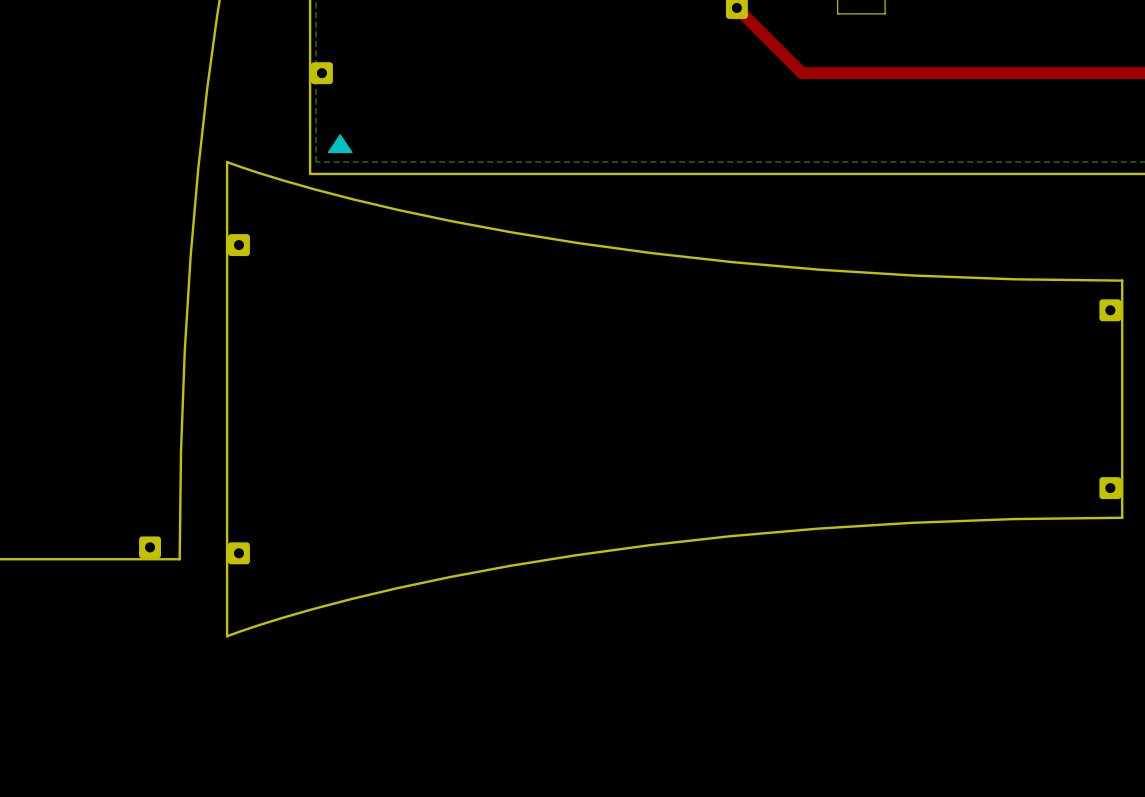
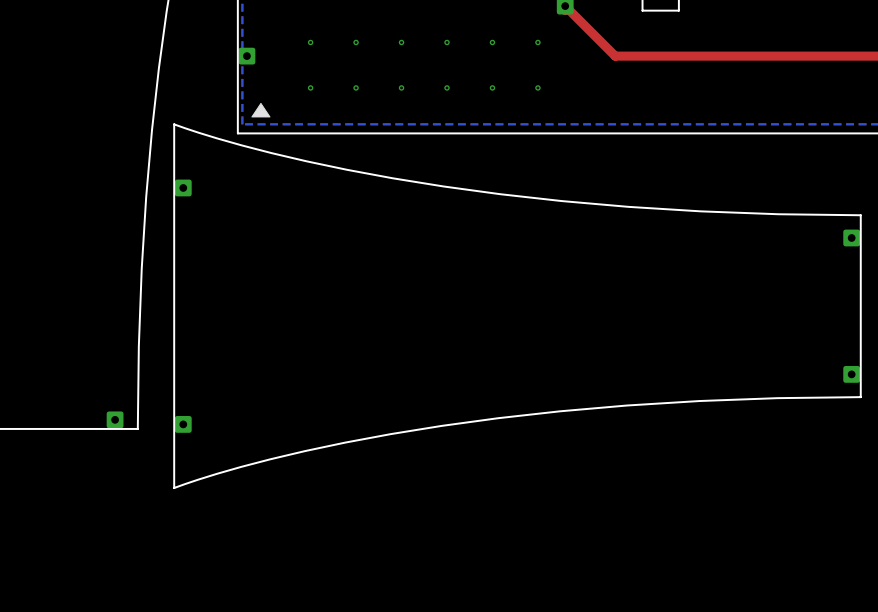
via: none -> (310, 42)
via: none -> (356, 42)
via: none -> (401, 42)
via: none -> (447, 42)
via: none -> (492, 42)
via: none -> (537, 42)
via: none -> (310, 87)
via: none -> (356, 87)
via: none -> (401, 87)
via: none -> (447, 87)
via: none -> (492, 87)
via: none -> (537, 87)

